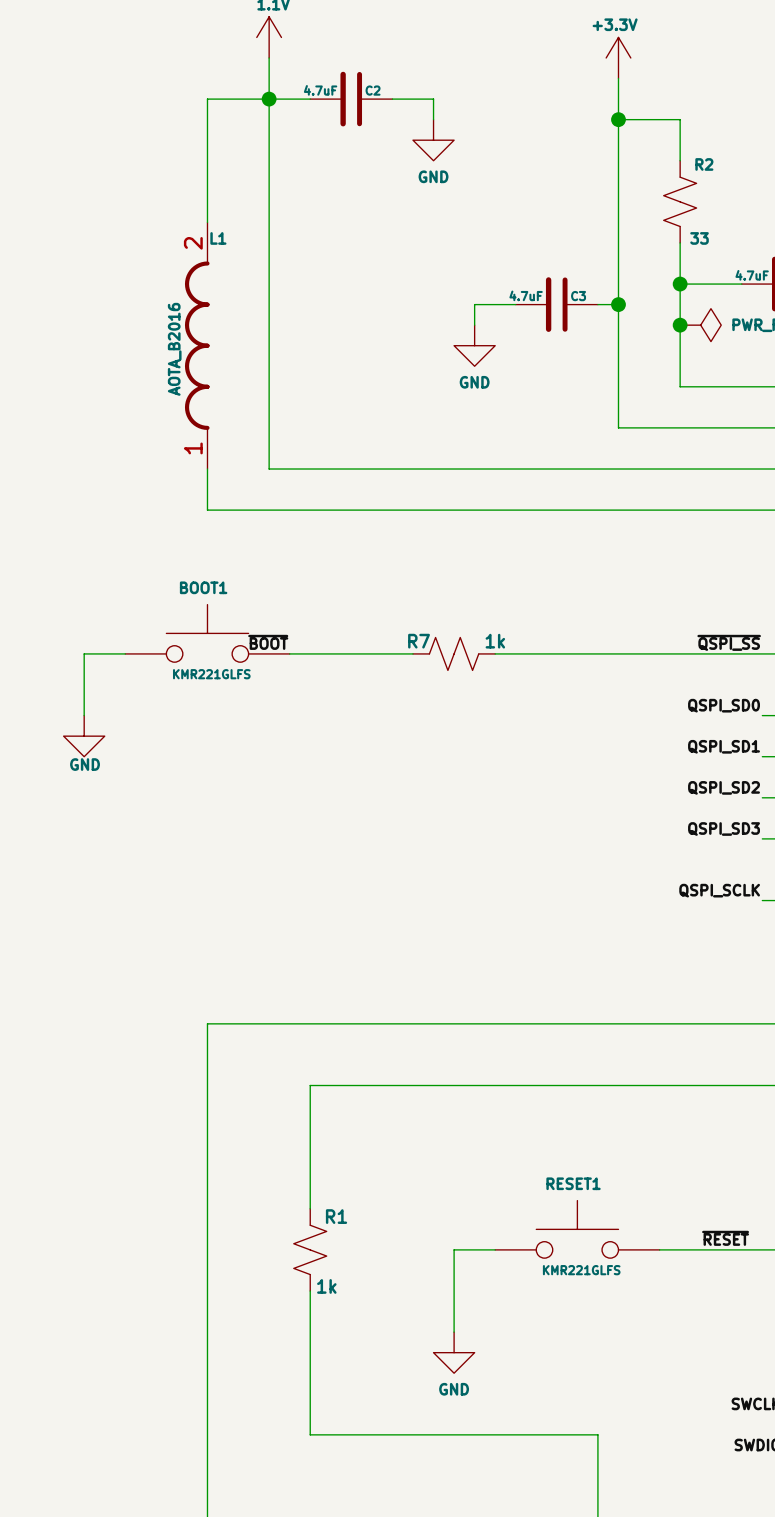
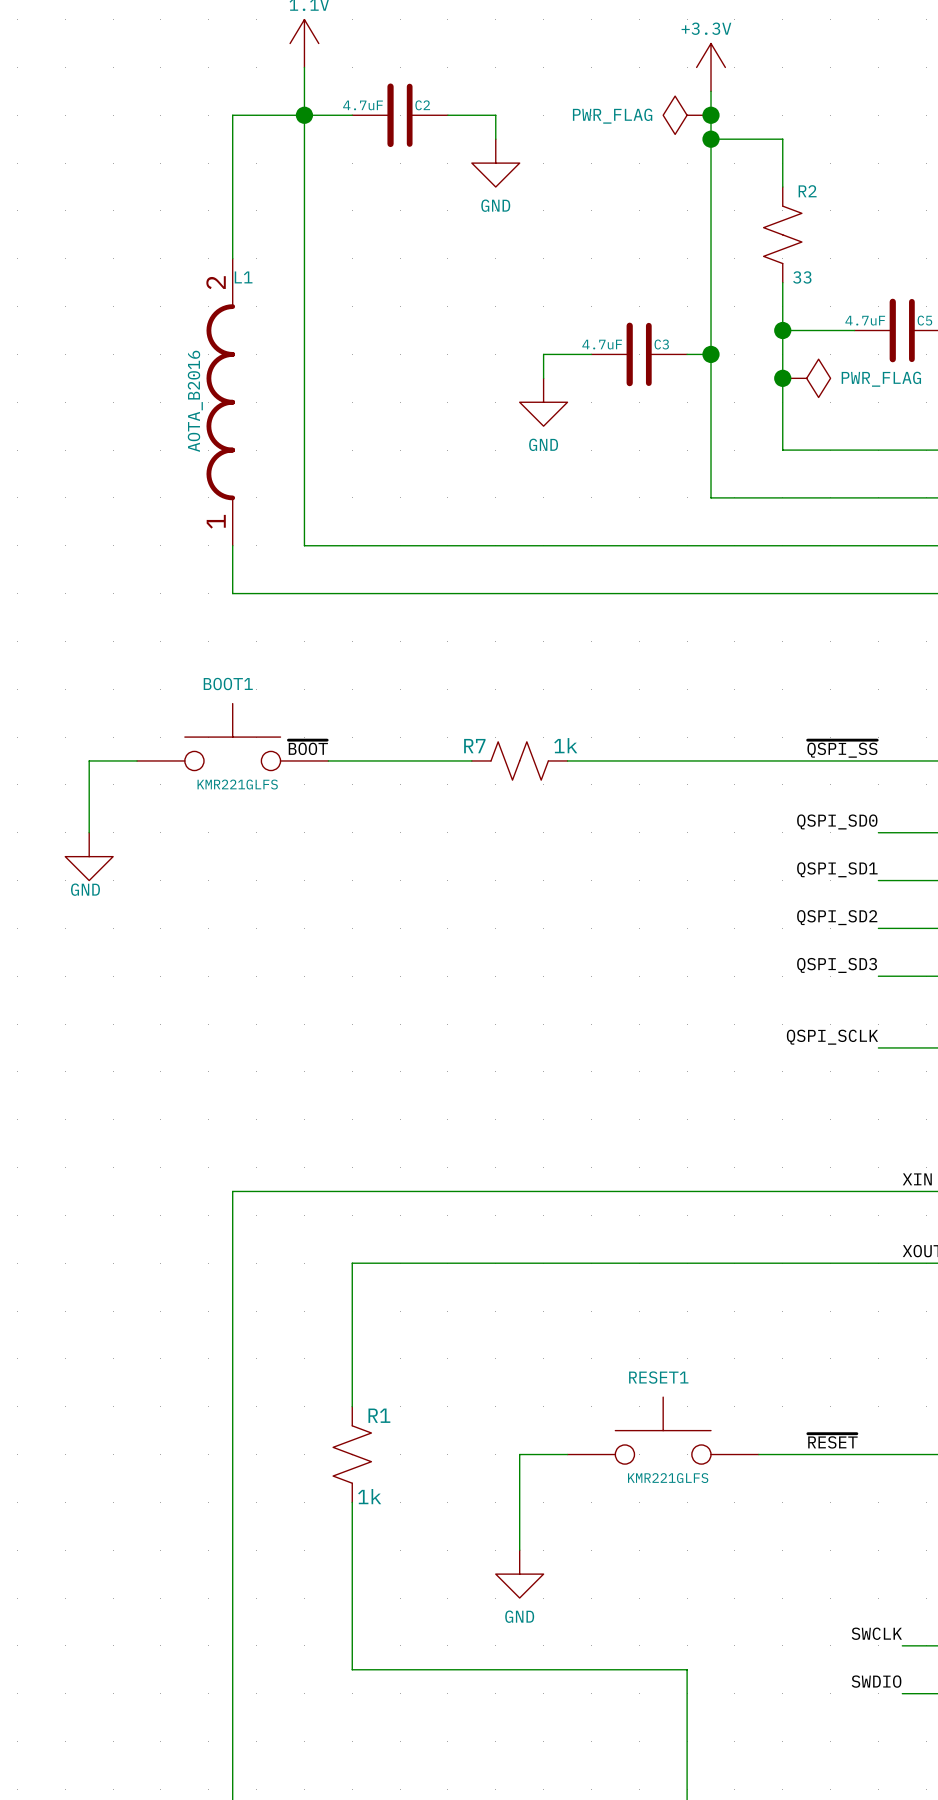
power symbol: none -> PWR_FLAG (687, 115)
junction: none -> (711, 115)

